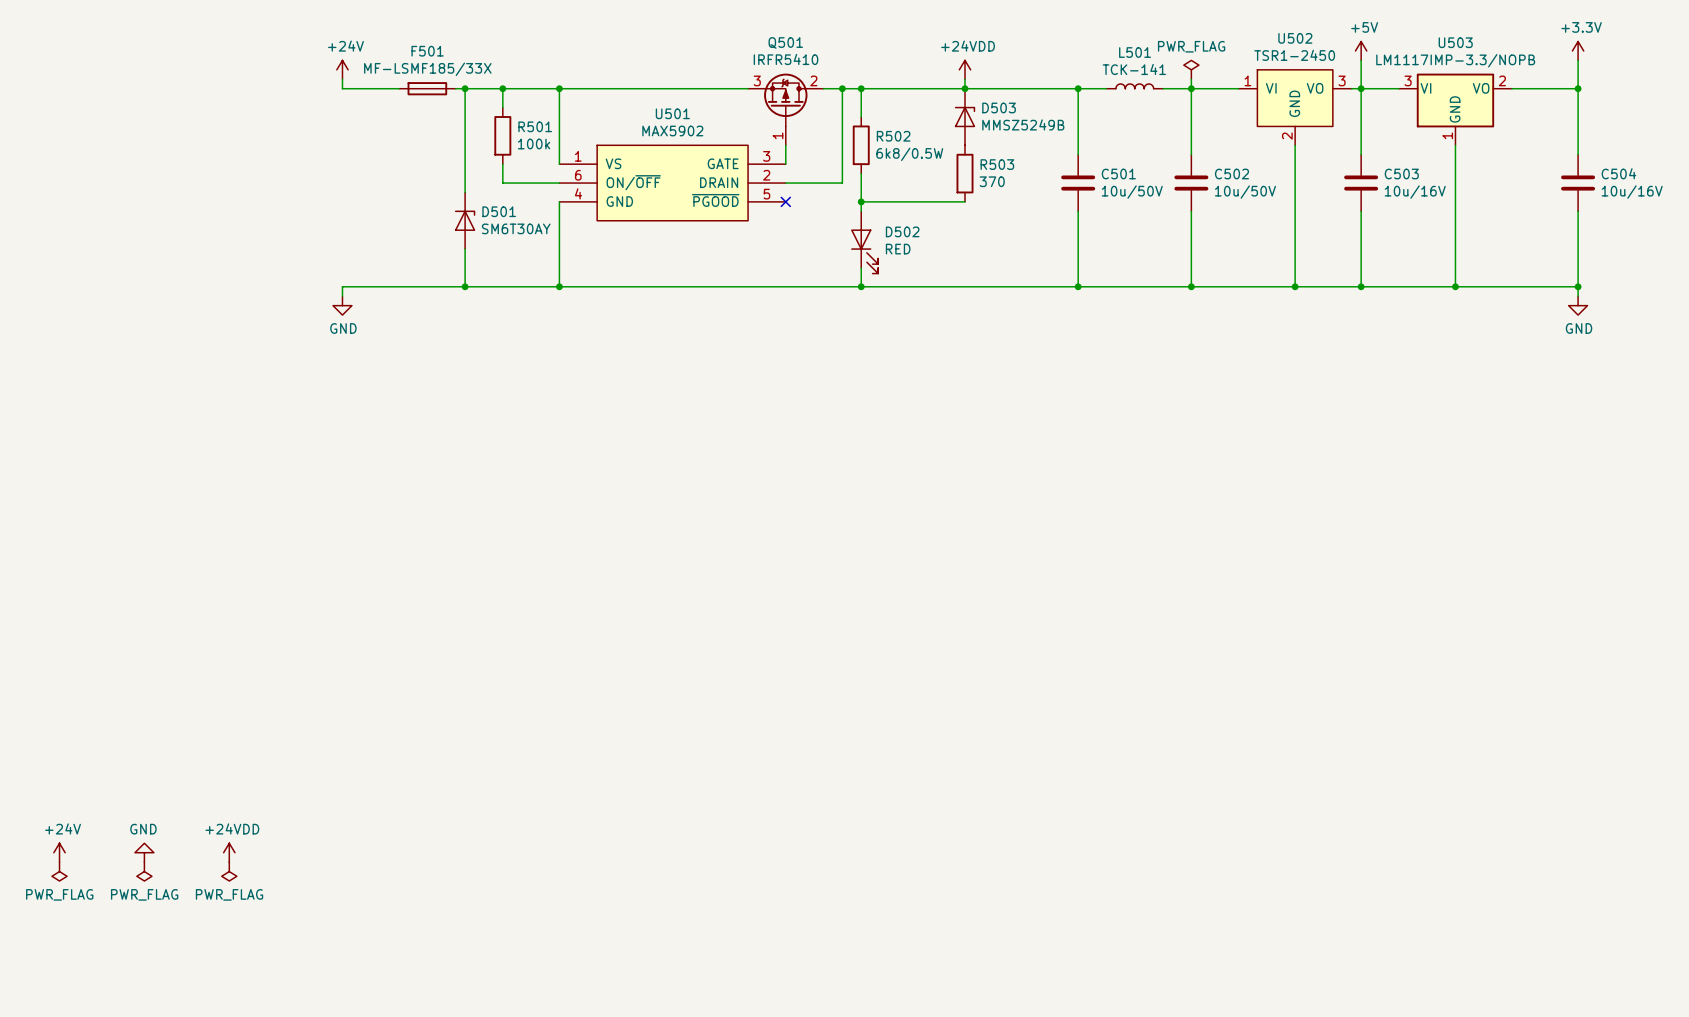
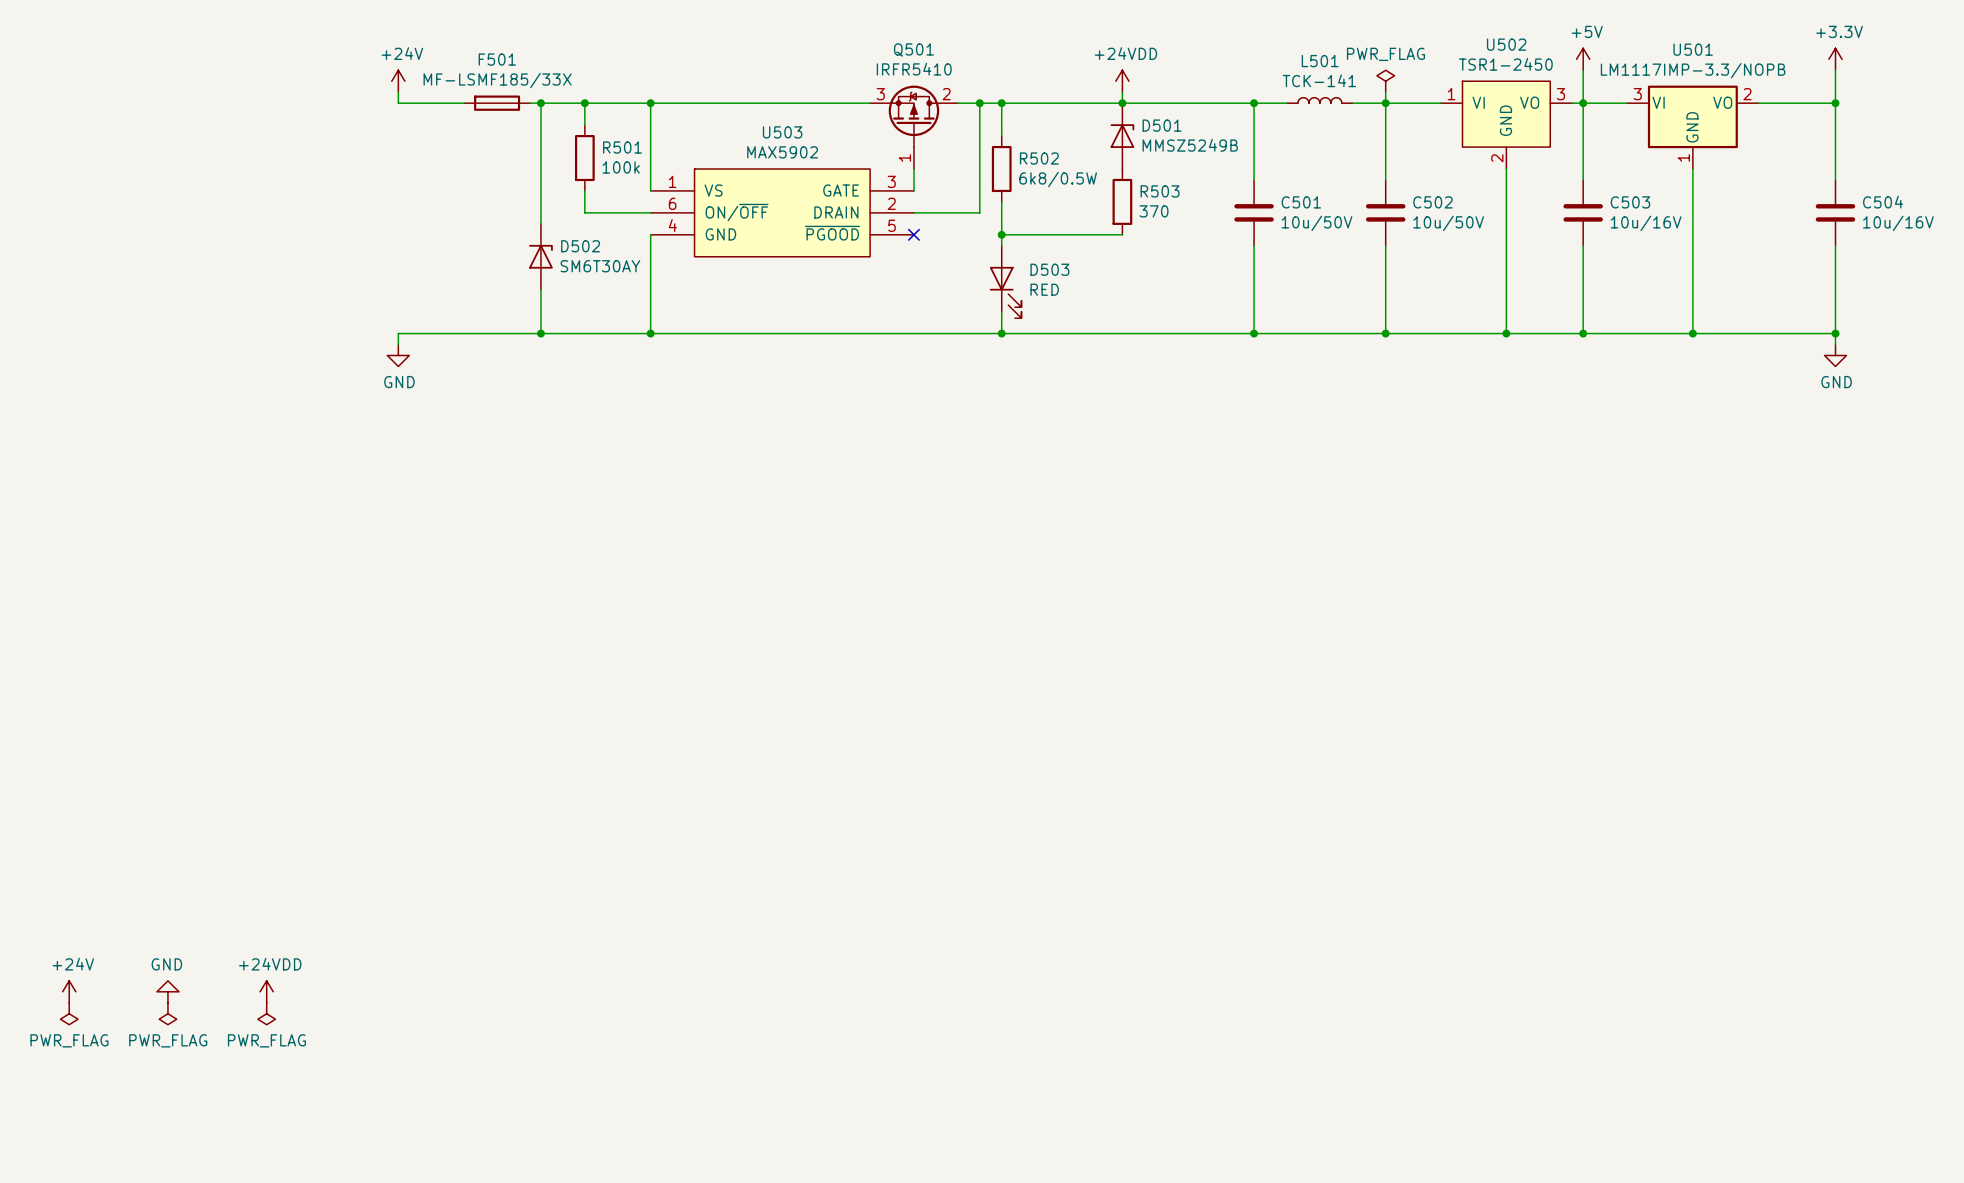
U503 name: U503 (1455, 42) -> U501 (1693, 49)
D503 name: D503 (999, 107) -> D501 (1162, 125)
U501 name: U501 (672, 113) -> U503 (782, 132)
D501 name: D501 (499, 211) -> D502 (580, 246)
D502 name: D502 (902, 231) -> D503 (1049, 269)

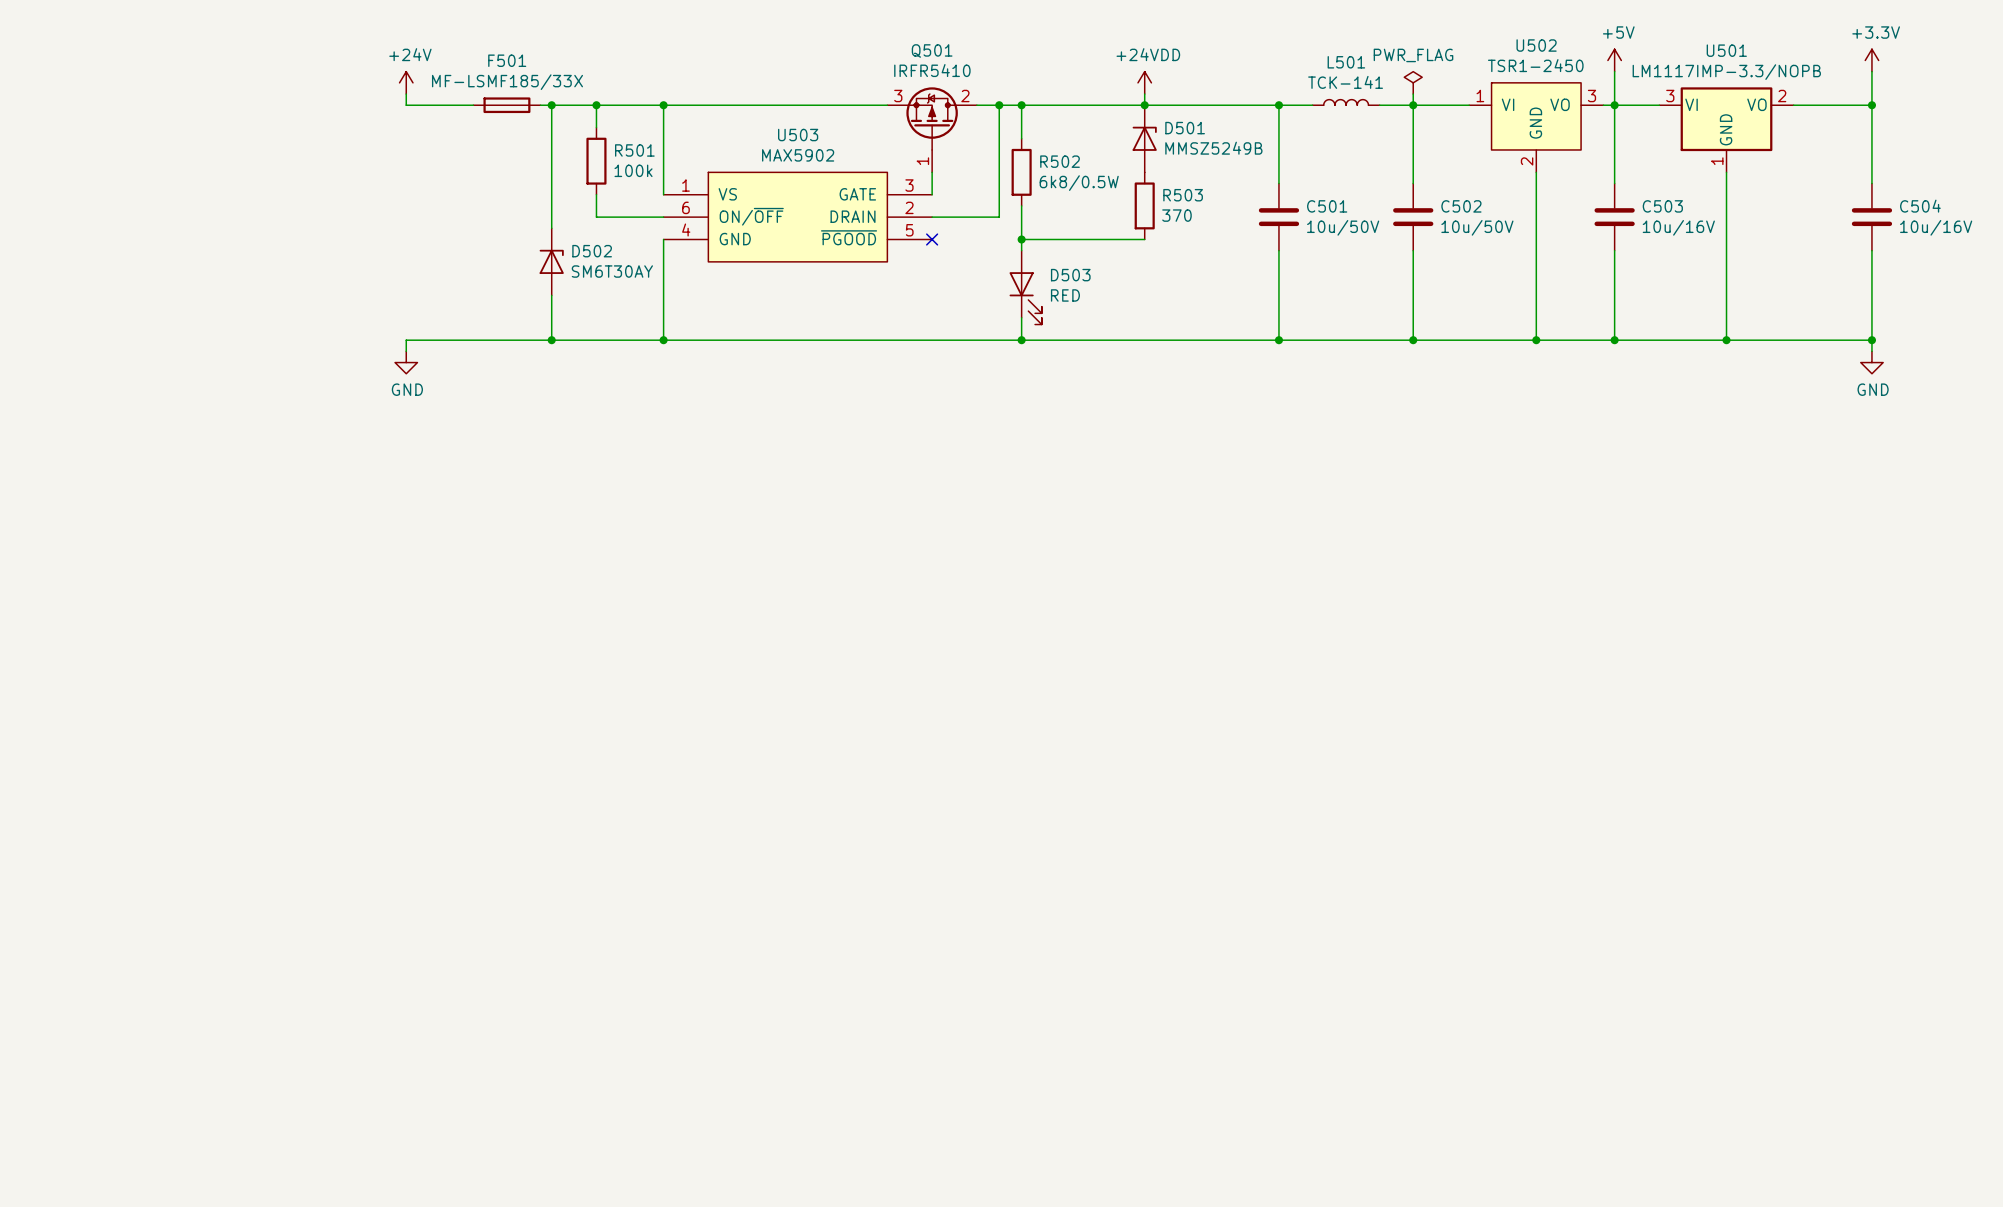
power symbol: +24V (69, 991) -> none
power symbol: GND (167, 991) -> none
power symbol: +24VDD (266, 991) -> none
power symbol: PWR_FLAG (69, 1013) -> none
power symbol: PWR_FLAG (167, 1013) -> none
power symbol: PWR_FLAG (266, 1013) -> none

